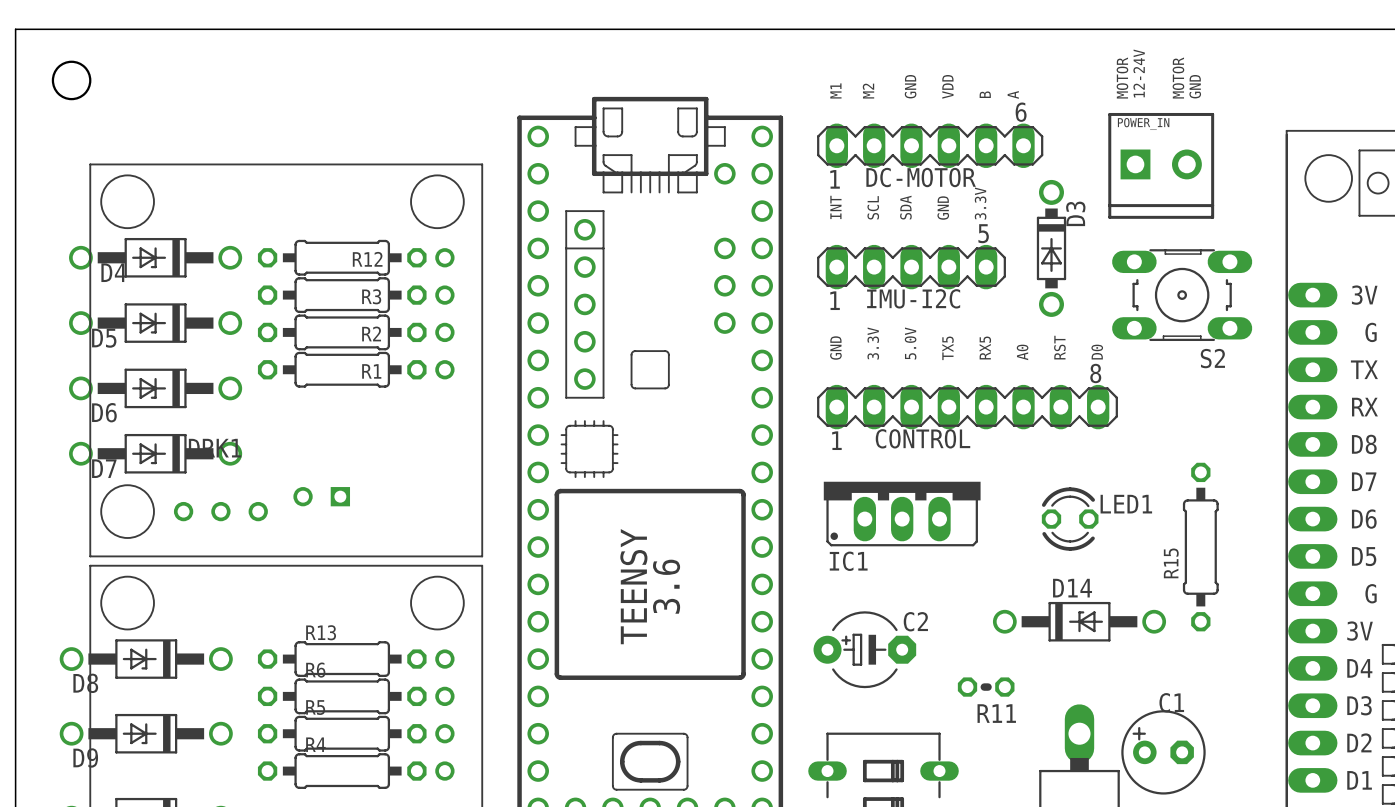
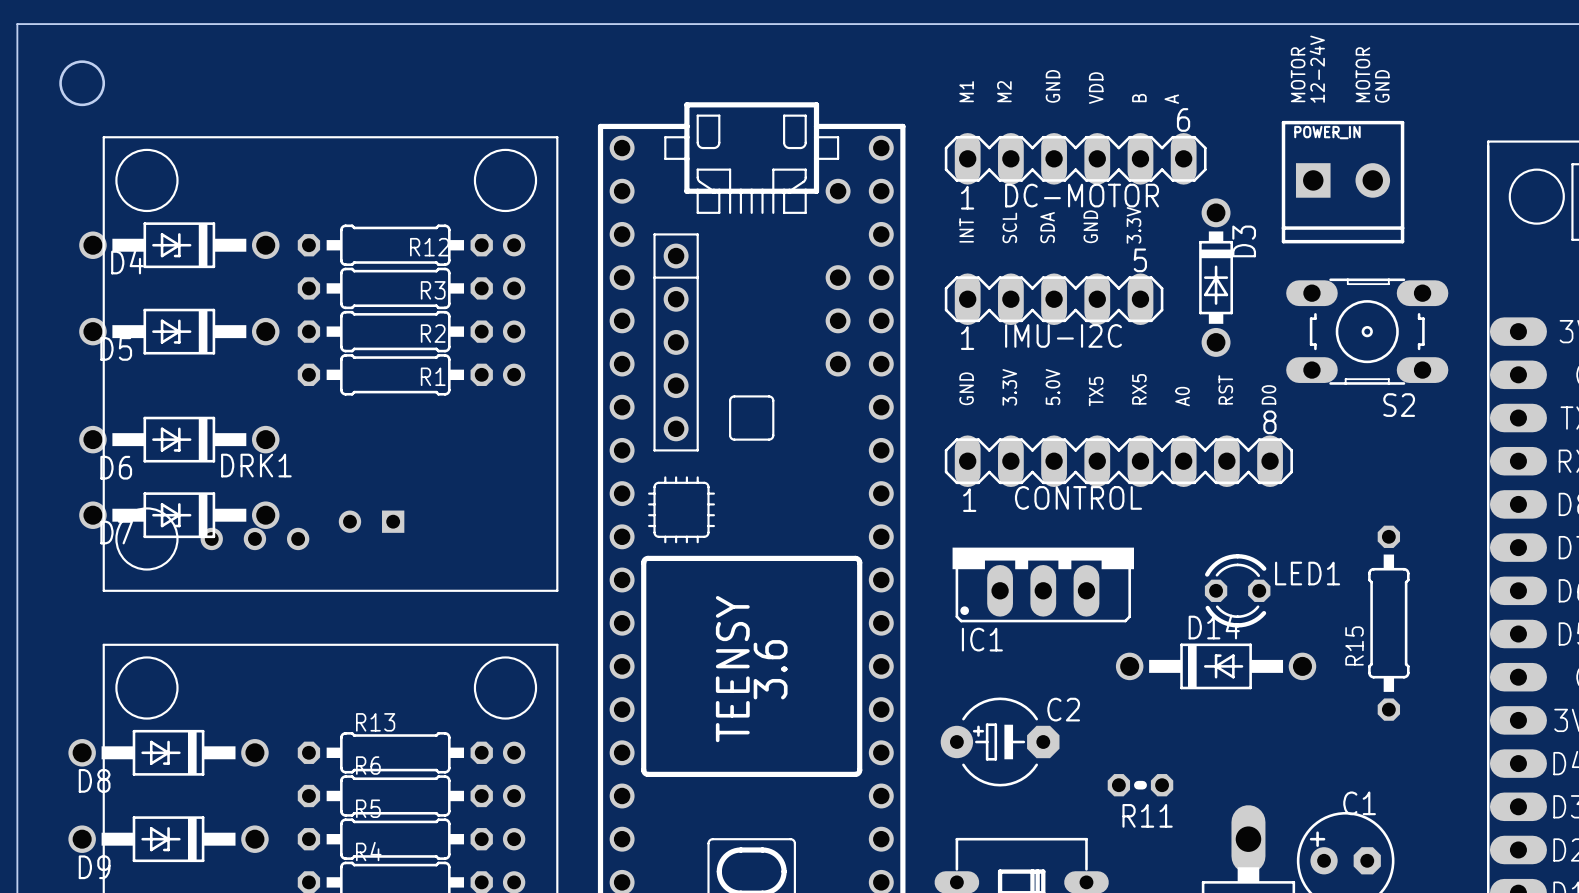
R12: none -> (395, 245)
D4 position: (155, 257) -> (179, 245)
R12 name: R12 (367, 259) -> R3 (433, 290)
R3 name: R3 (371, 296) -> R2 (433, 333)
D5 position: (155, 323) -> (179, 331)
R2 name: R2 (371, 333) -> R1 (433, 376)
DRK1 position: (286, 360) -> (330, 364)
R1: (342, 369) -> none
D14 position: (1079, 621) -> (1216, 666)

